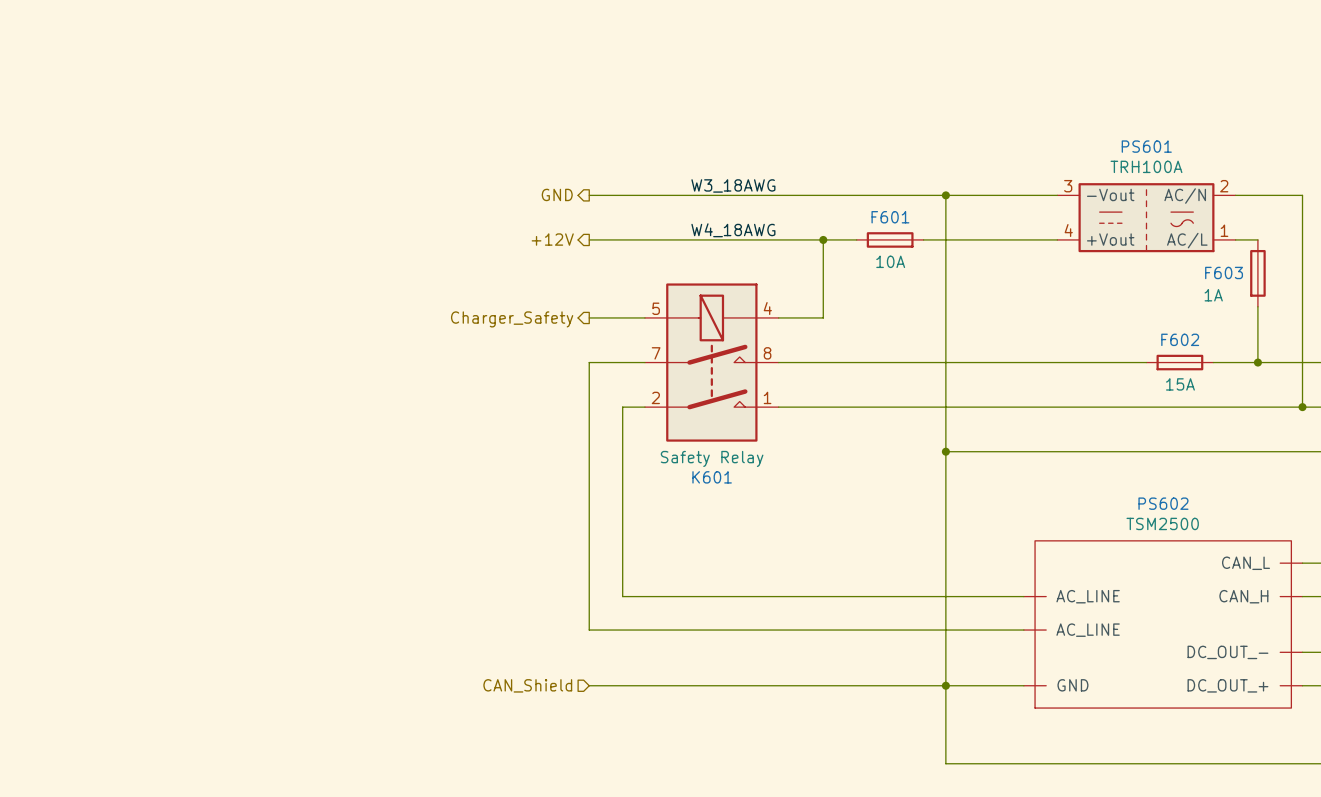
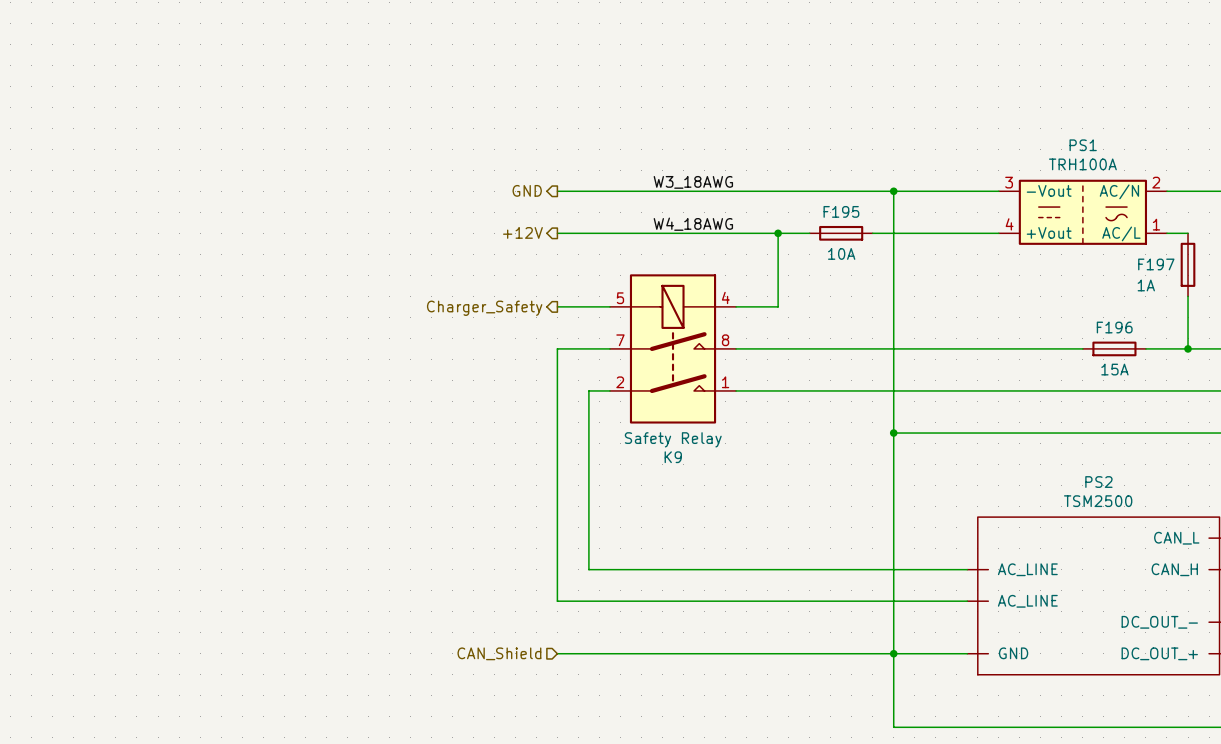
PS601 name: PS601 (1146, 146) -> PS1 (1083, 145)
F601 name: F601 (890, 217) -> F195 (841, 211)
F603 name: F603 (1224, 272) -> F197 (1156, 264)
F602 name: F602 (1180, 339) -> F196 (1114, 327)
K601 name: K601 (712, 477) -> K9 (673, 457)
PS602 name: PS602 (1163, 503) -> PS2 (1098, 482)

